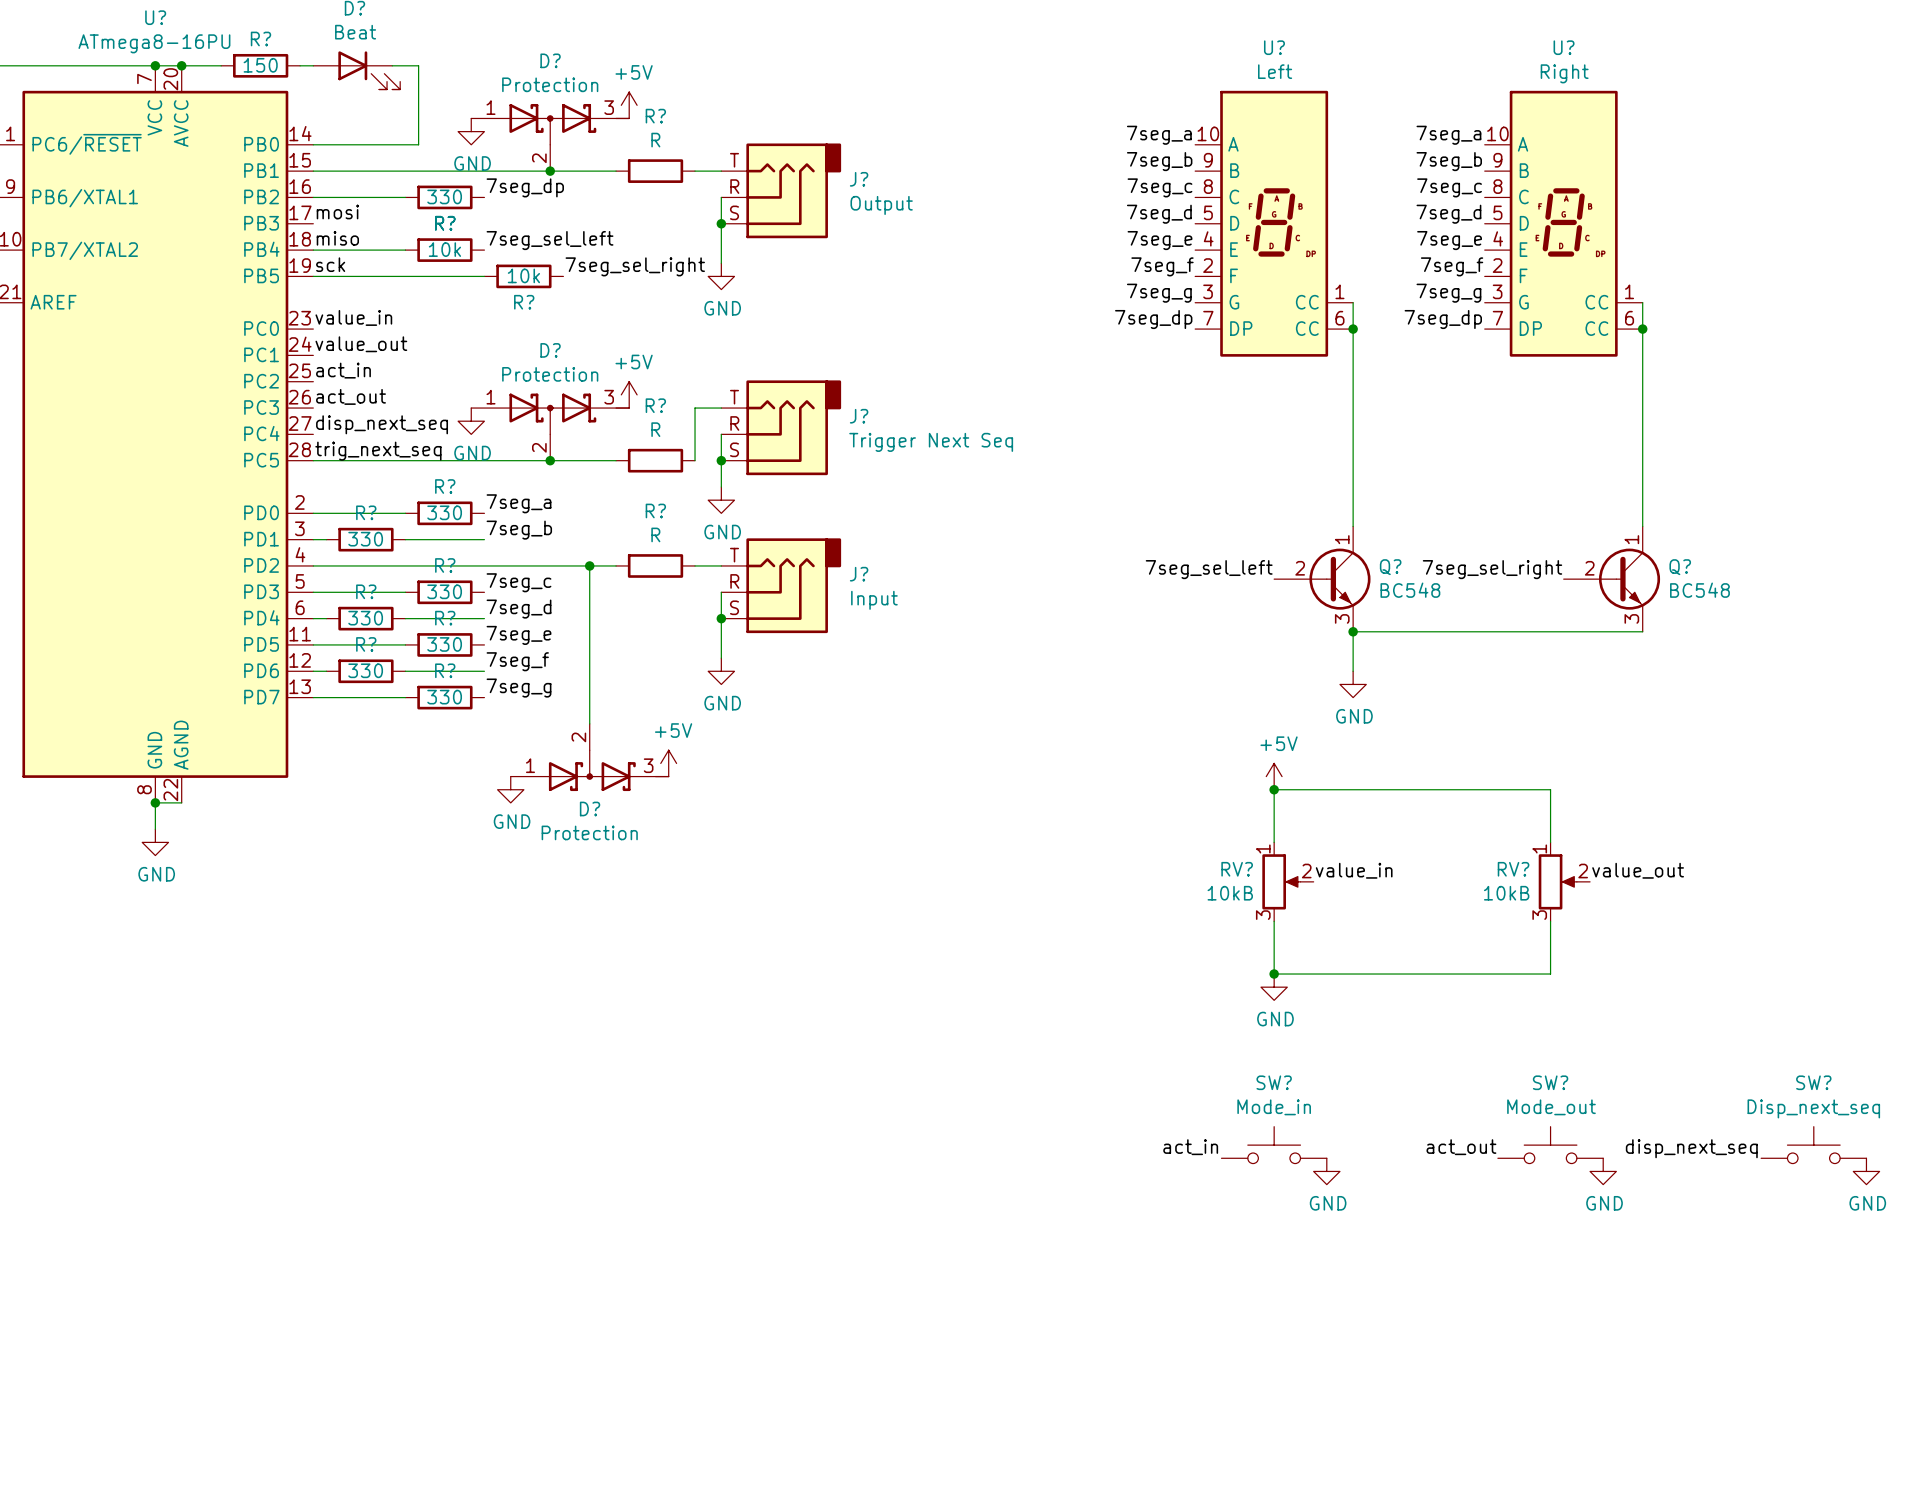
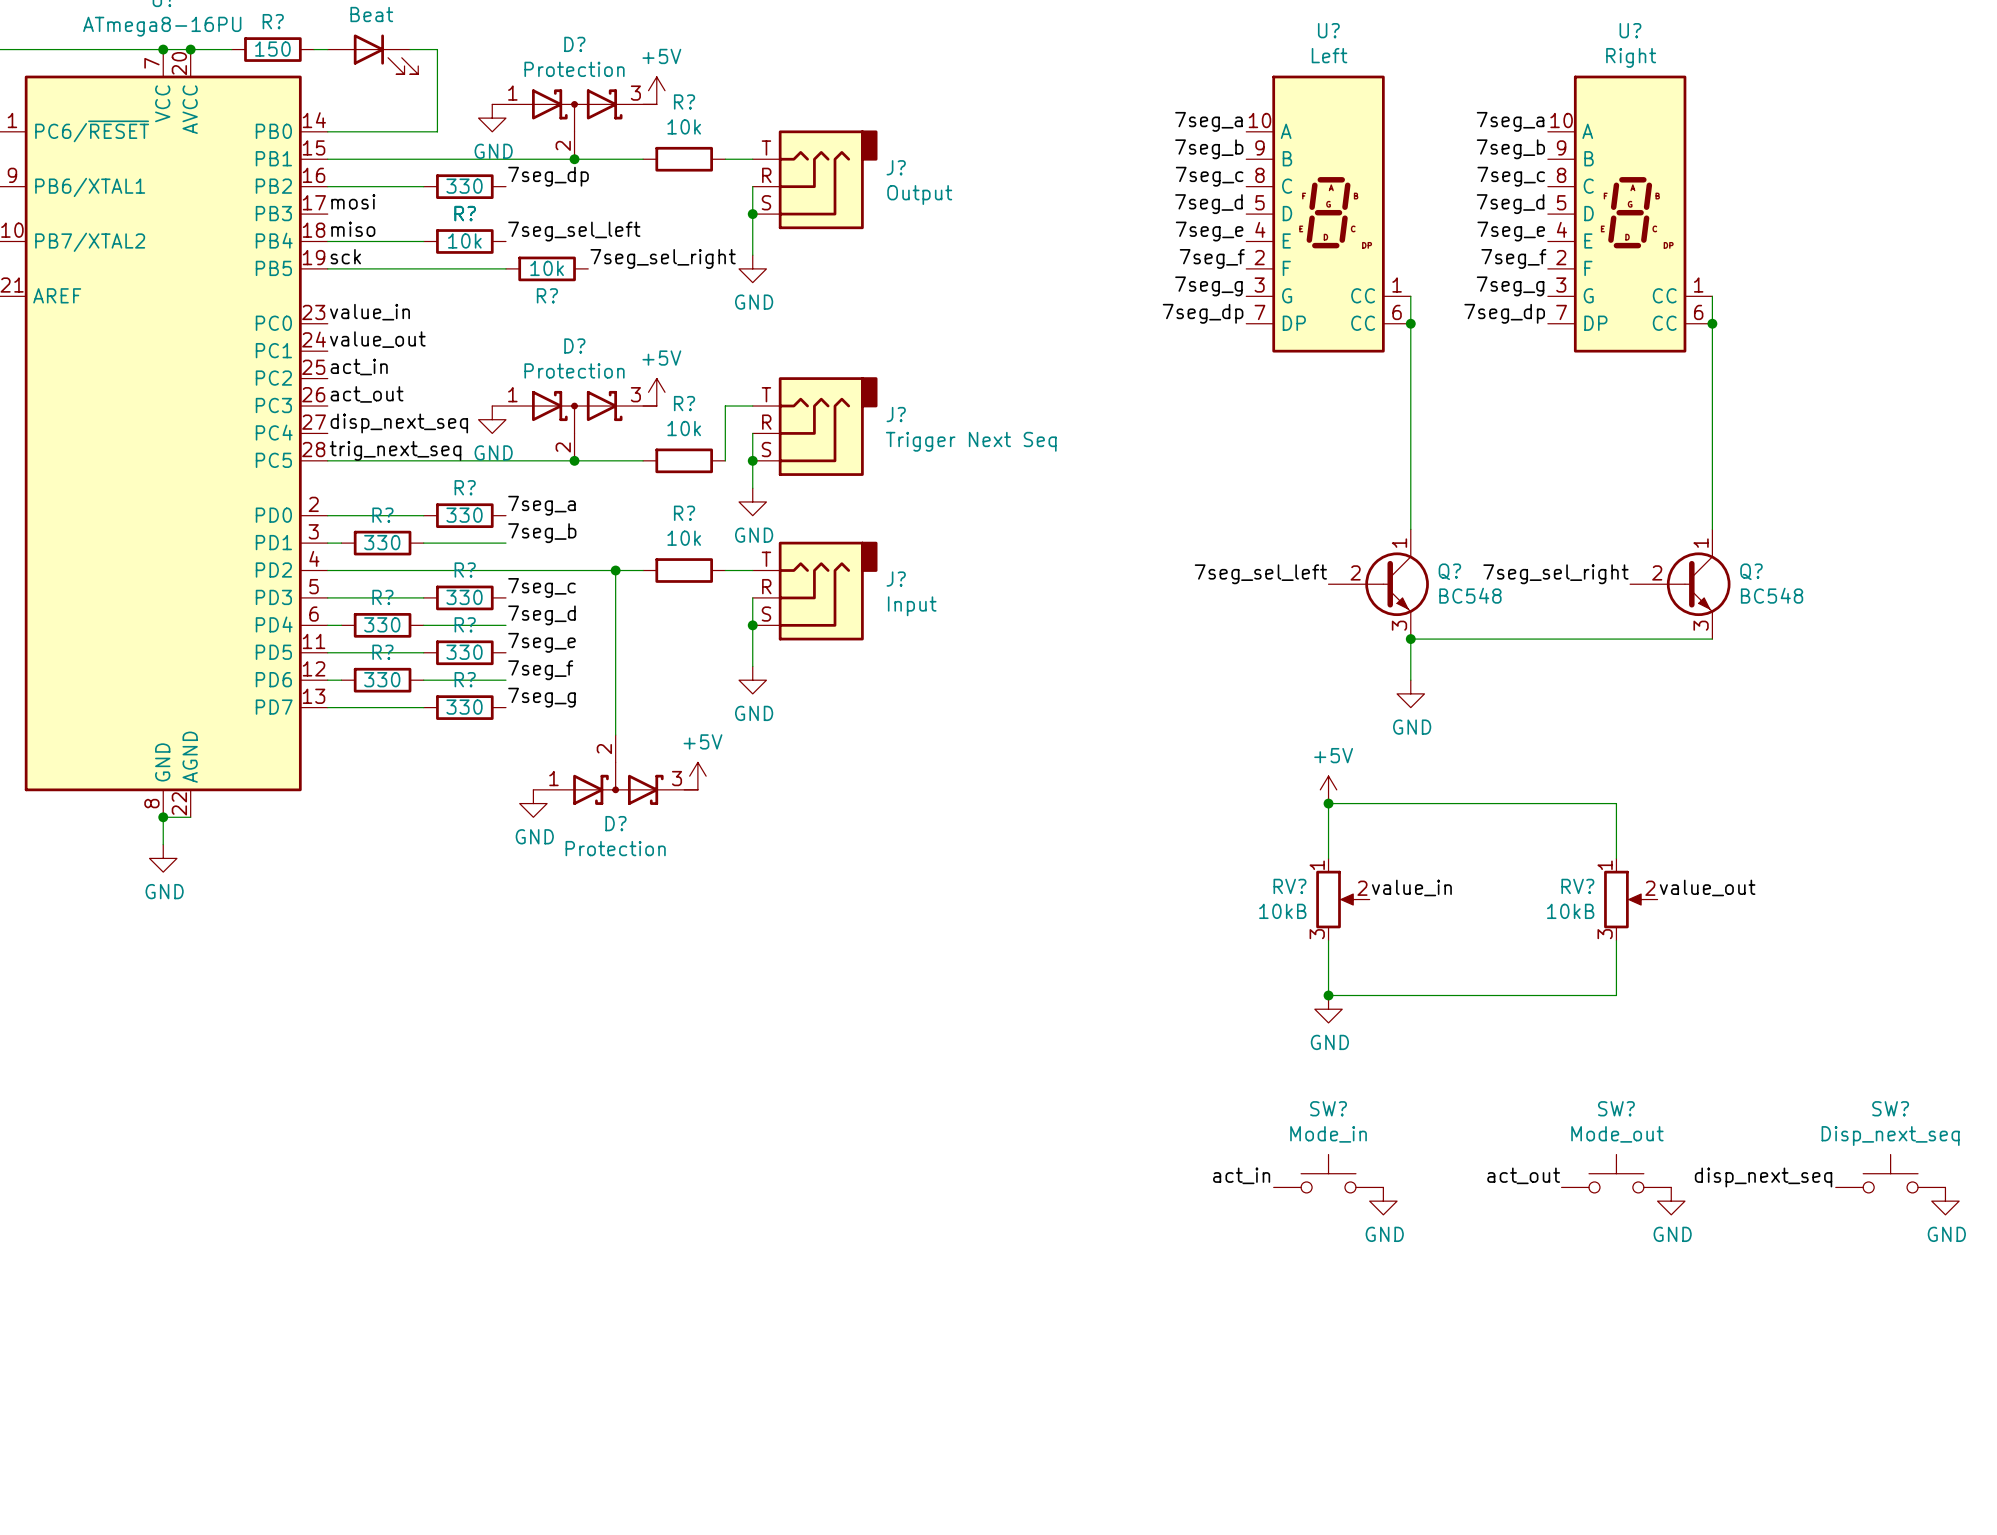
R? value: R (655, 140) -> 10k (684, 126)
R? value: R (655, 429) -> 10k (684, 428)
R? value: R (655, 534) -> 10k (684, 538)

